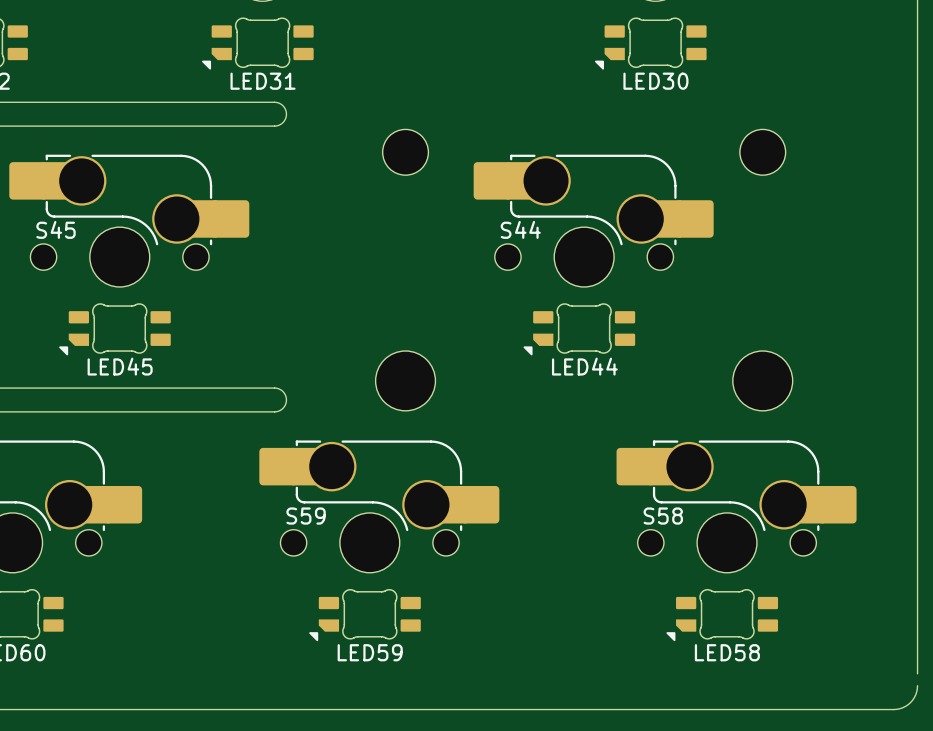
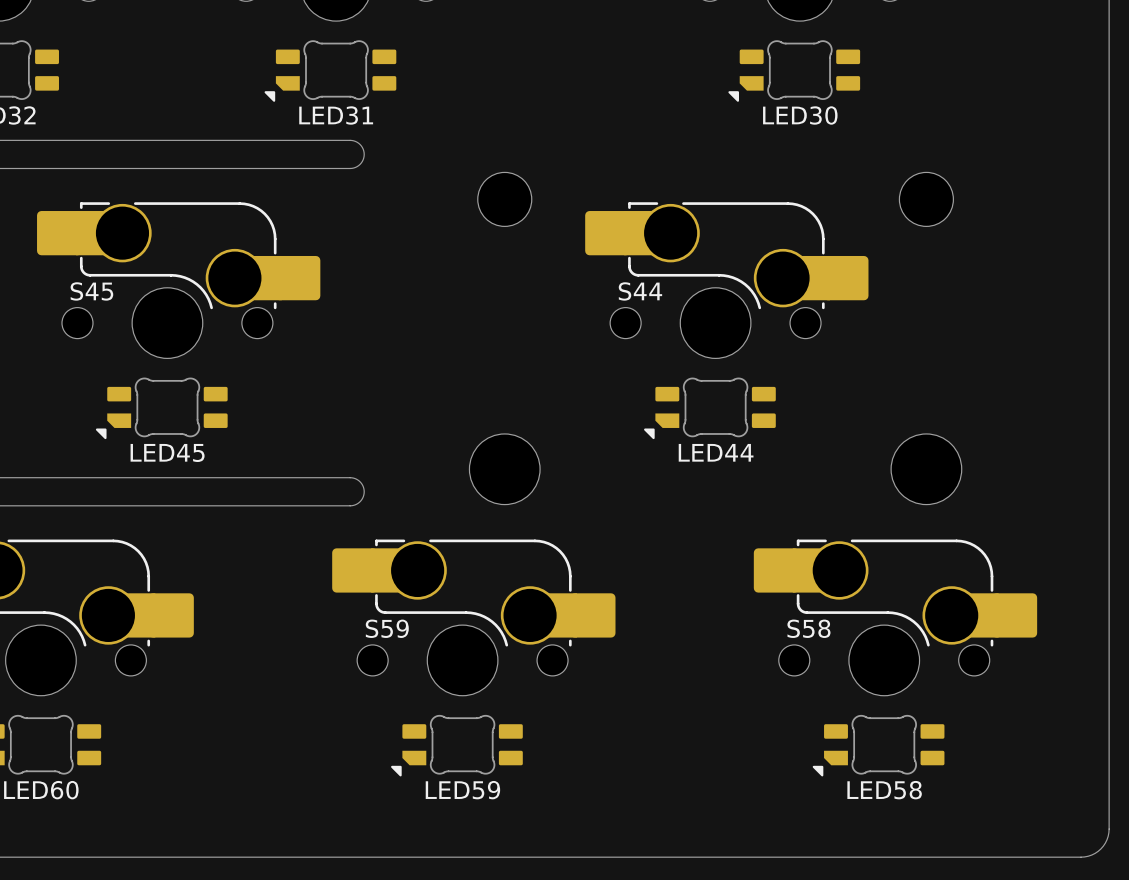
board edge: none -> (1109, 815) (1109, 829)

